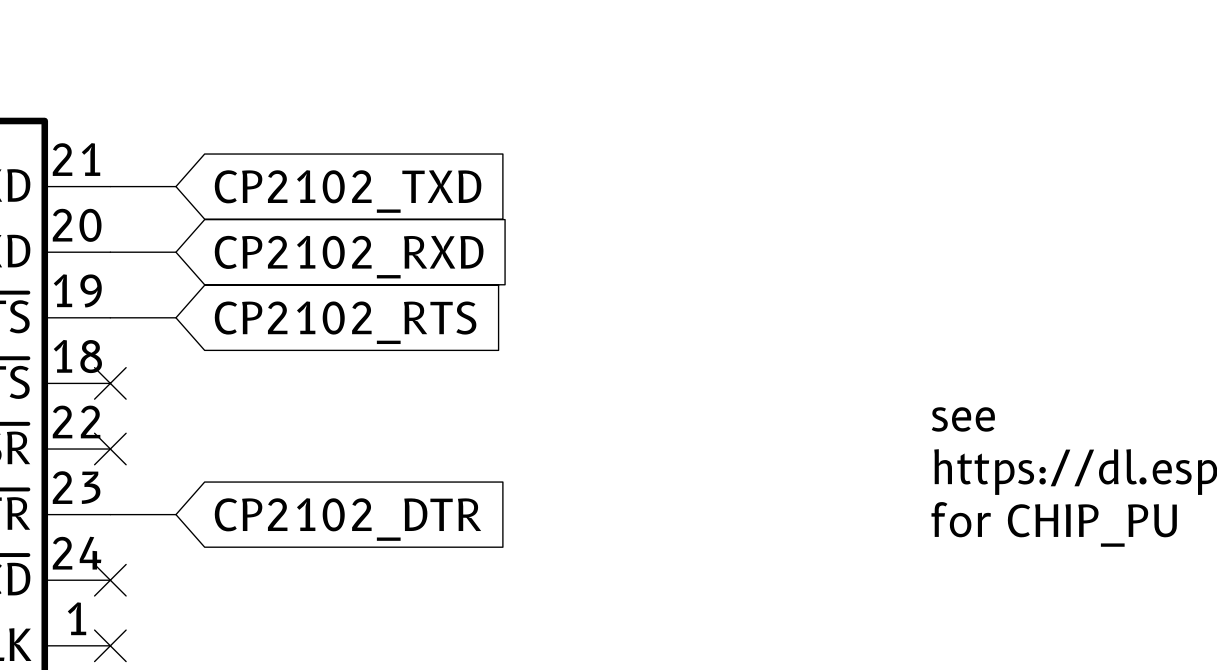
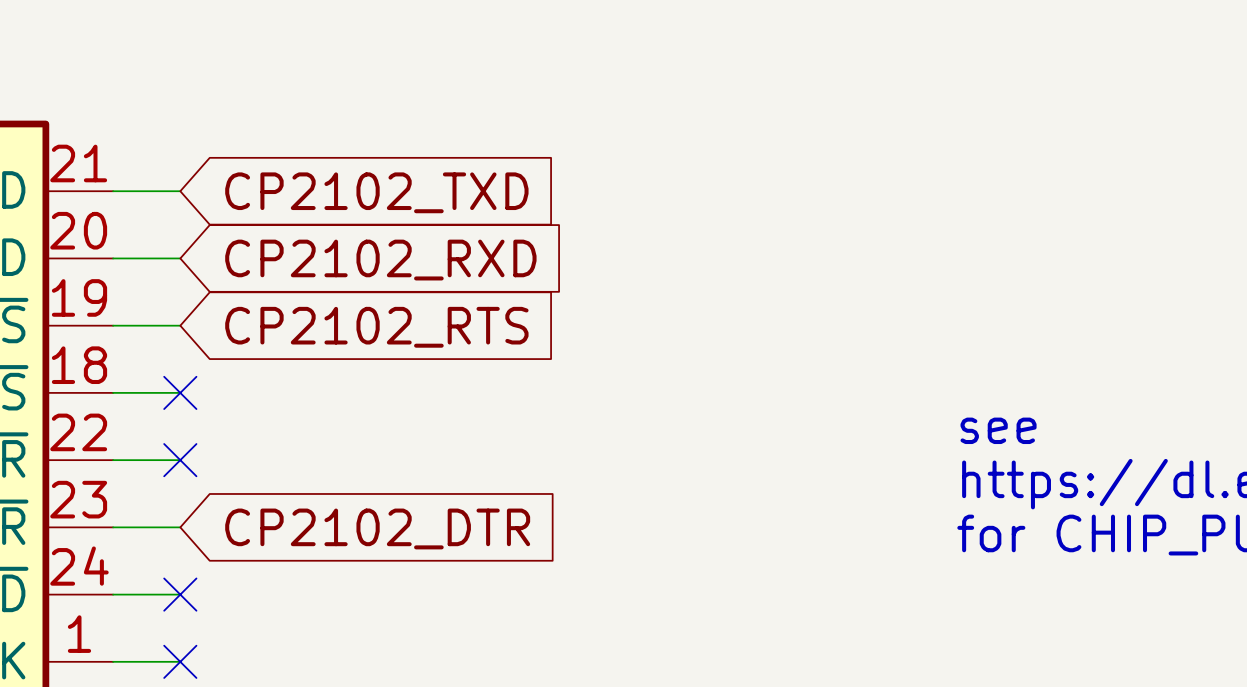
wire: none -> (113, 392) (180, 392)
no-connect mark: (110, 383) -> none
no-connect mark: none -> (180, 392)
wire: none -> (113, 460) (180, 460)
no-connect mark: (110, 449) -> none
no-connect mark: none -> (180, 460)
wire: none -> (113, 594) (180, 594)
no-connect mark: (110, 580) -> none
no-connect mark: none -> (180, 594)
wire: none -> (113, 661) (180, 661)
no-connect mark: (110, 645) -> none
no-connect mark: none -> (180, 661)

